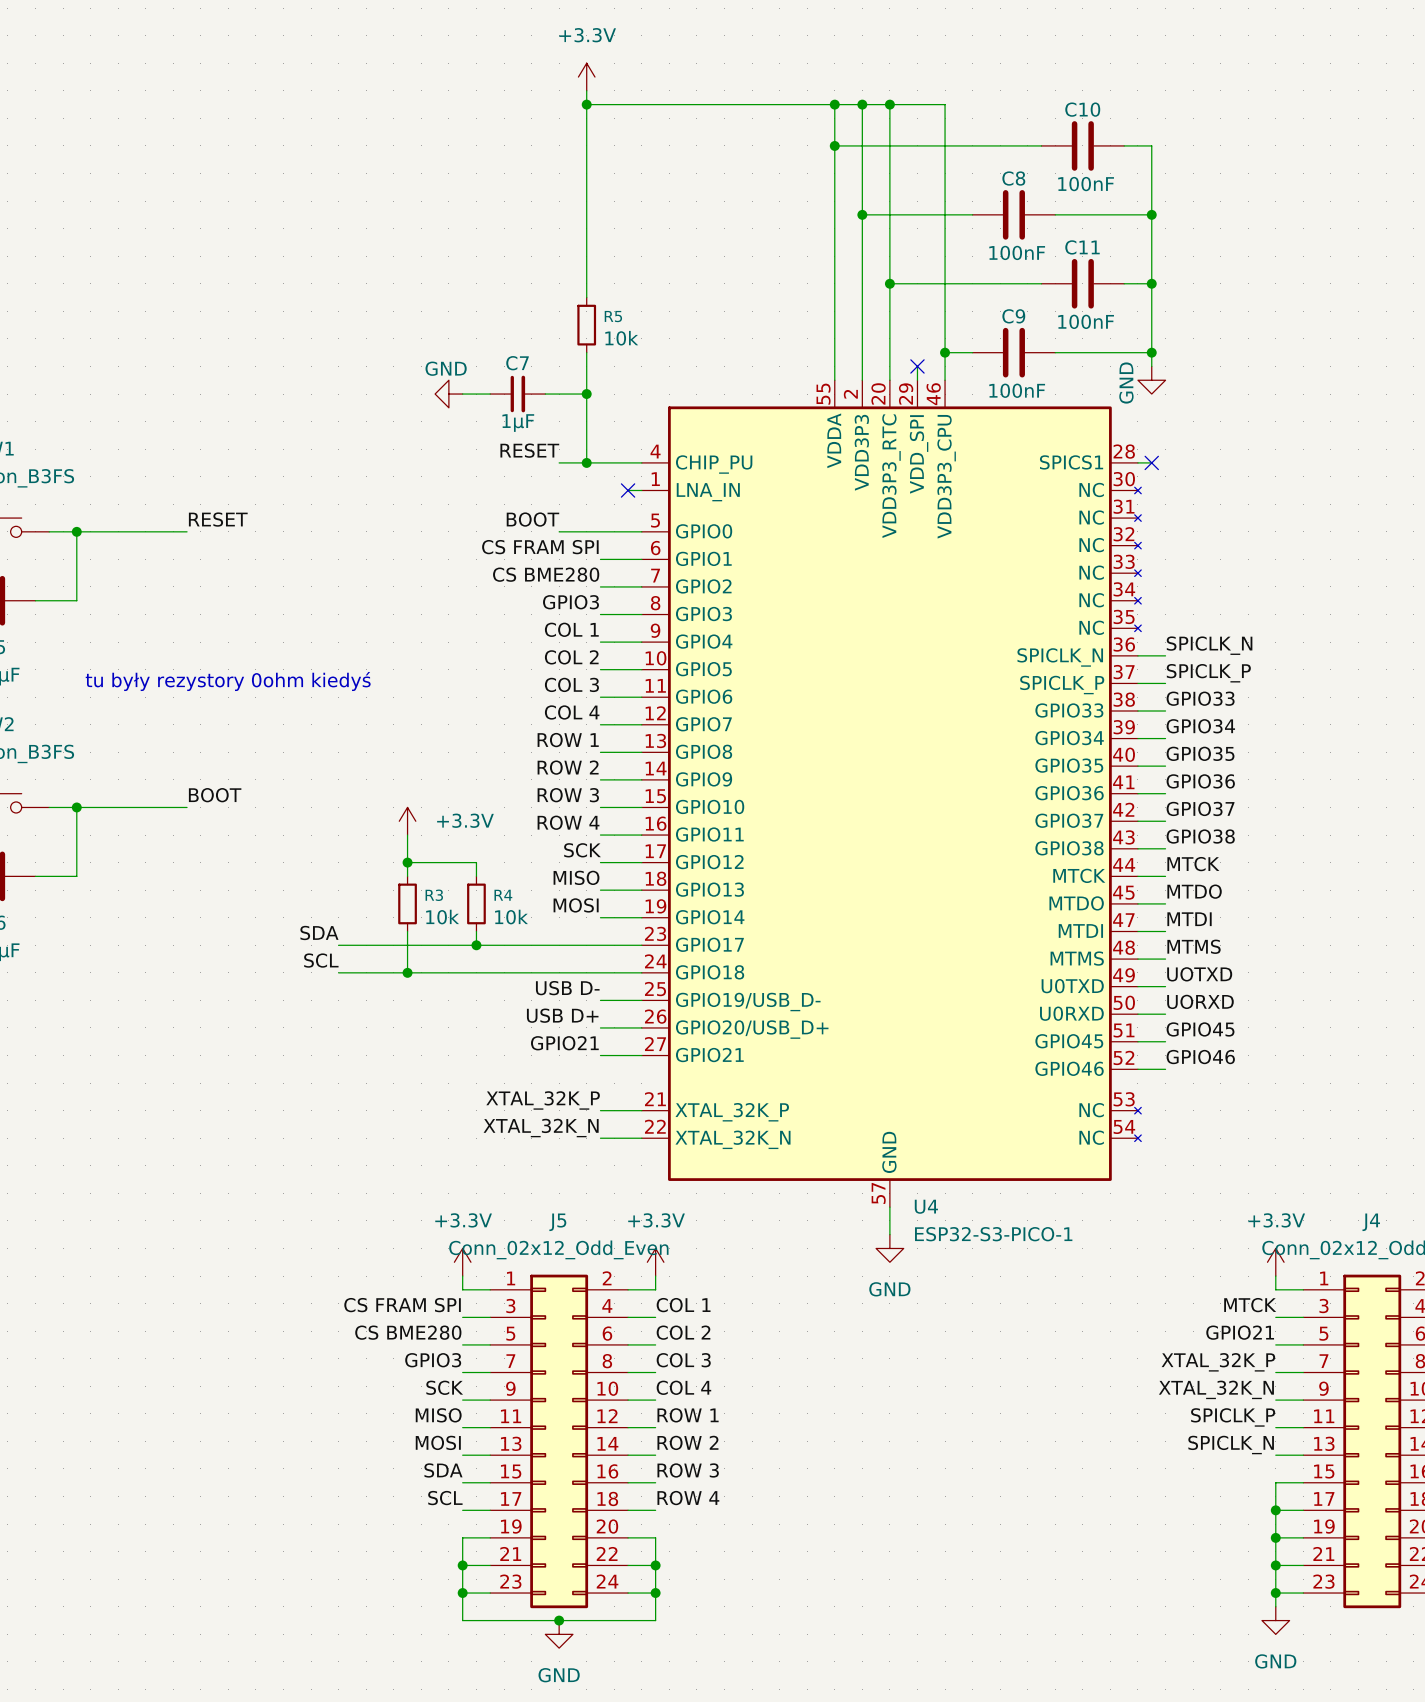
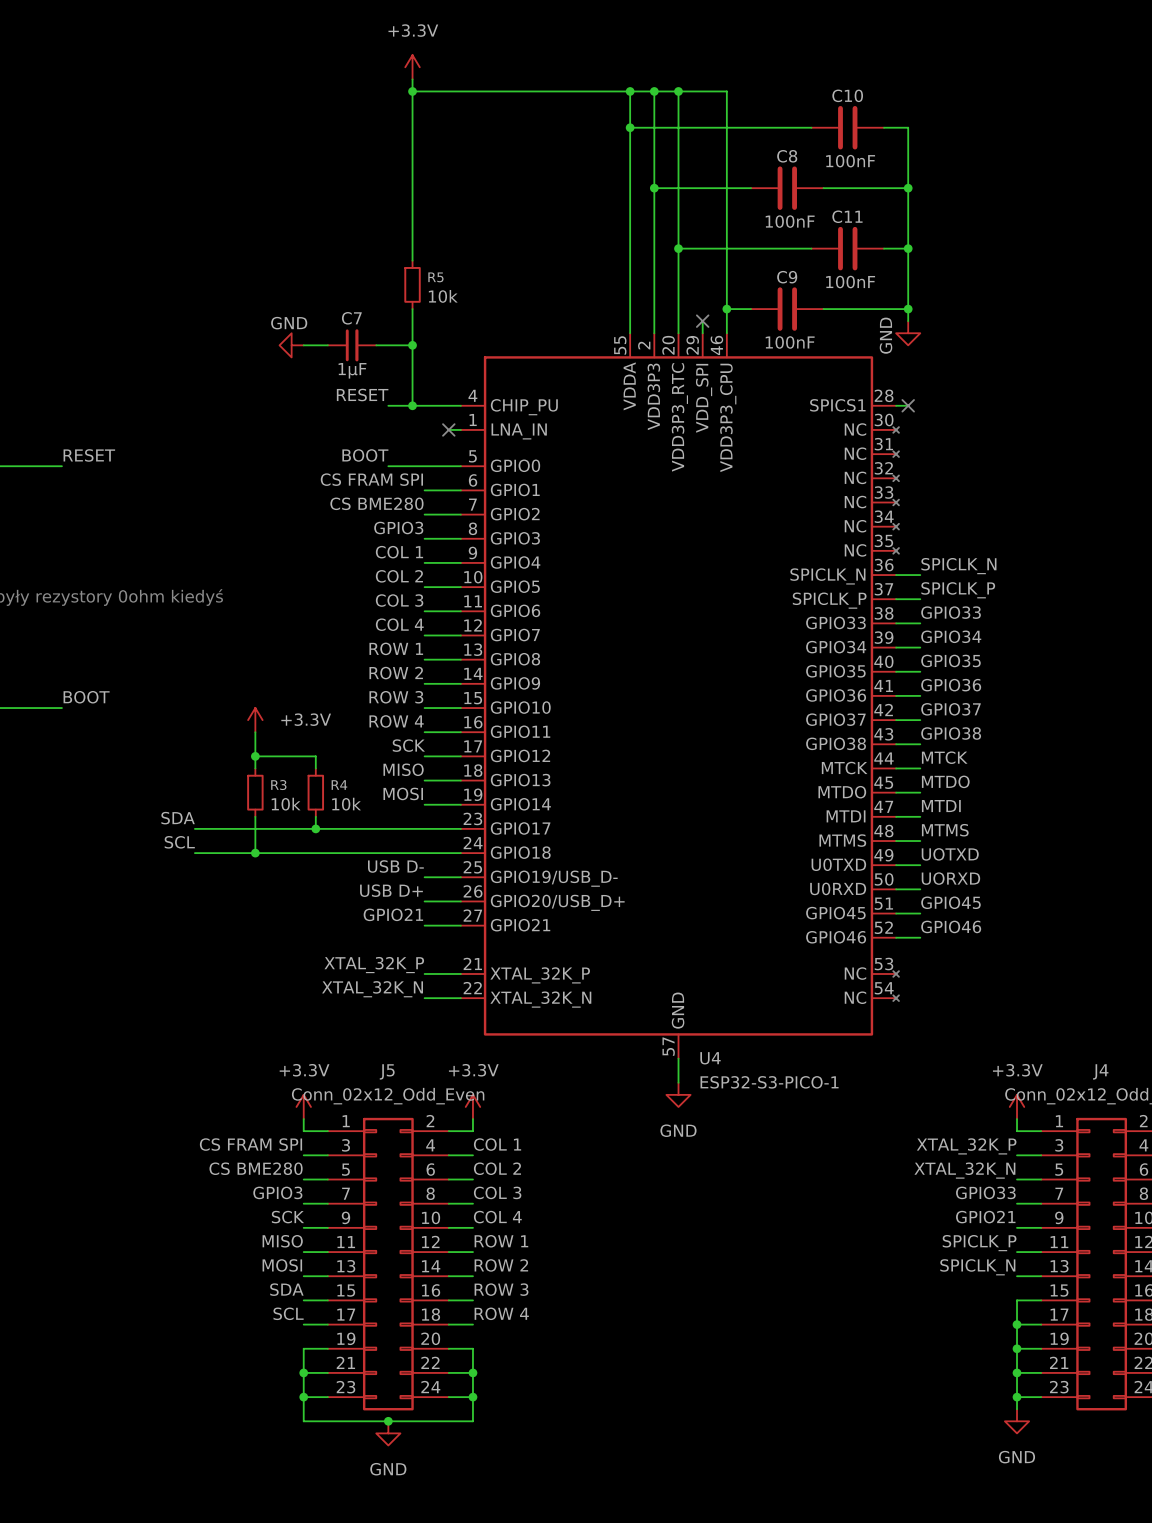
label: MTCK (1250, 1305) -> XTAL_32K_P (966, 1146)
label: GPIO21 (1240, 1332) -> XTAL_32K_N (964, 1170)
label: XTAL_32K_P (1218, 1362) -> GPIO33 (985, 1192)
label: XTAL_32K_N (1216, 1389) -> GPIO21 (985, 1217)

